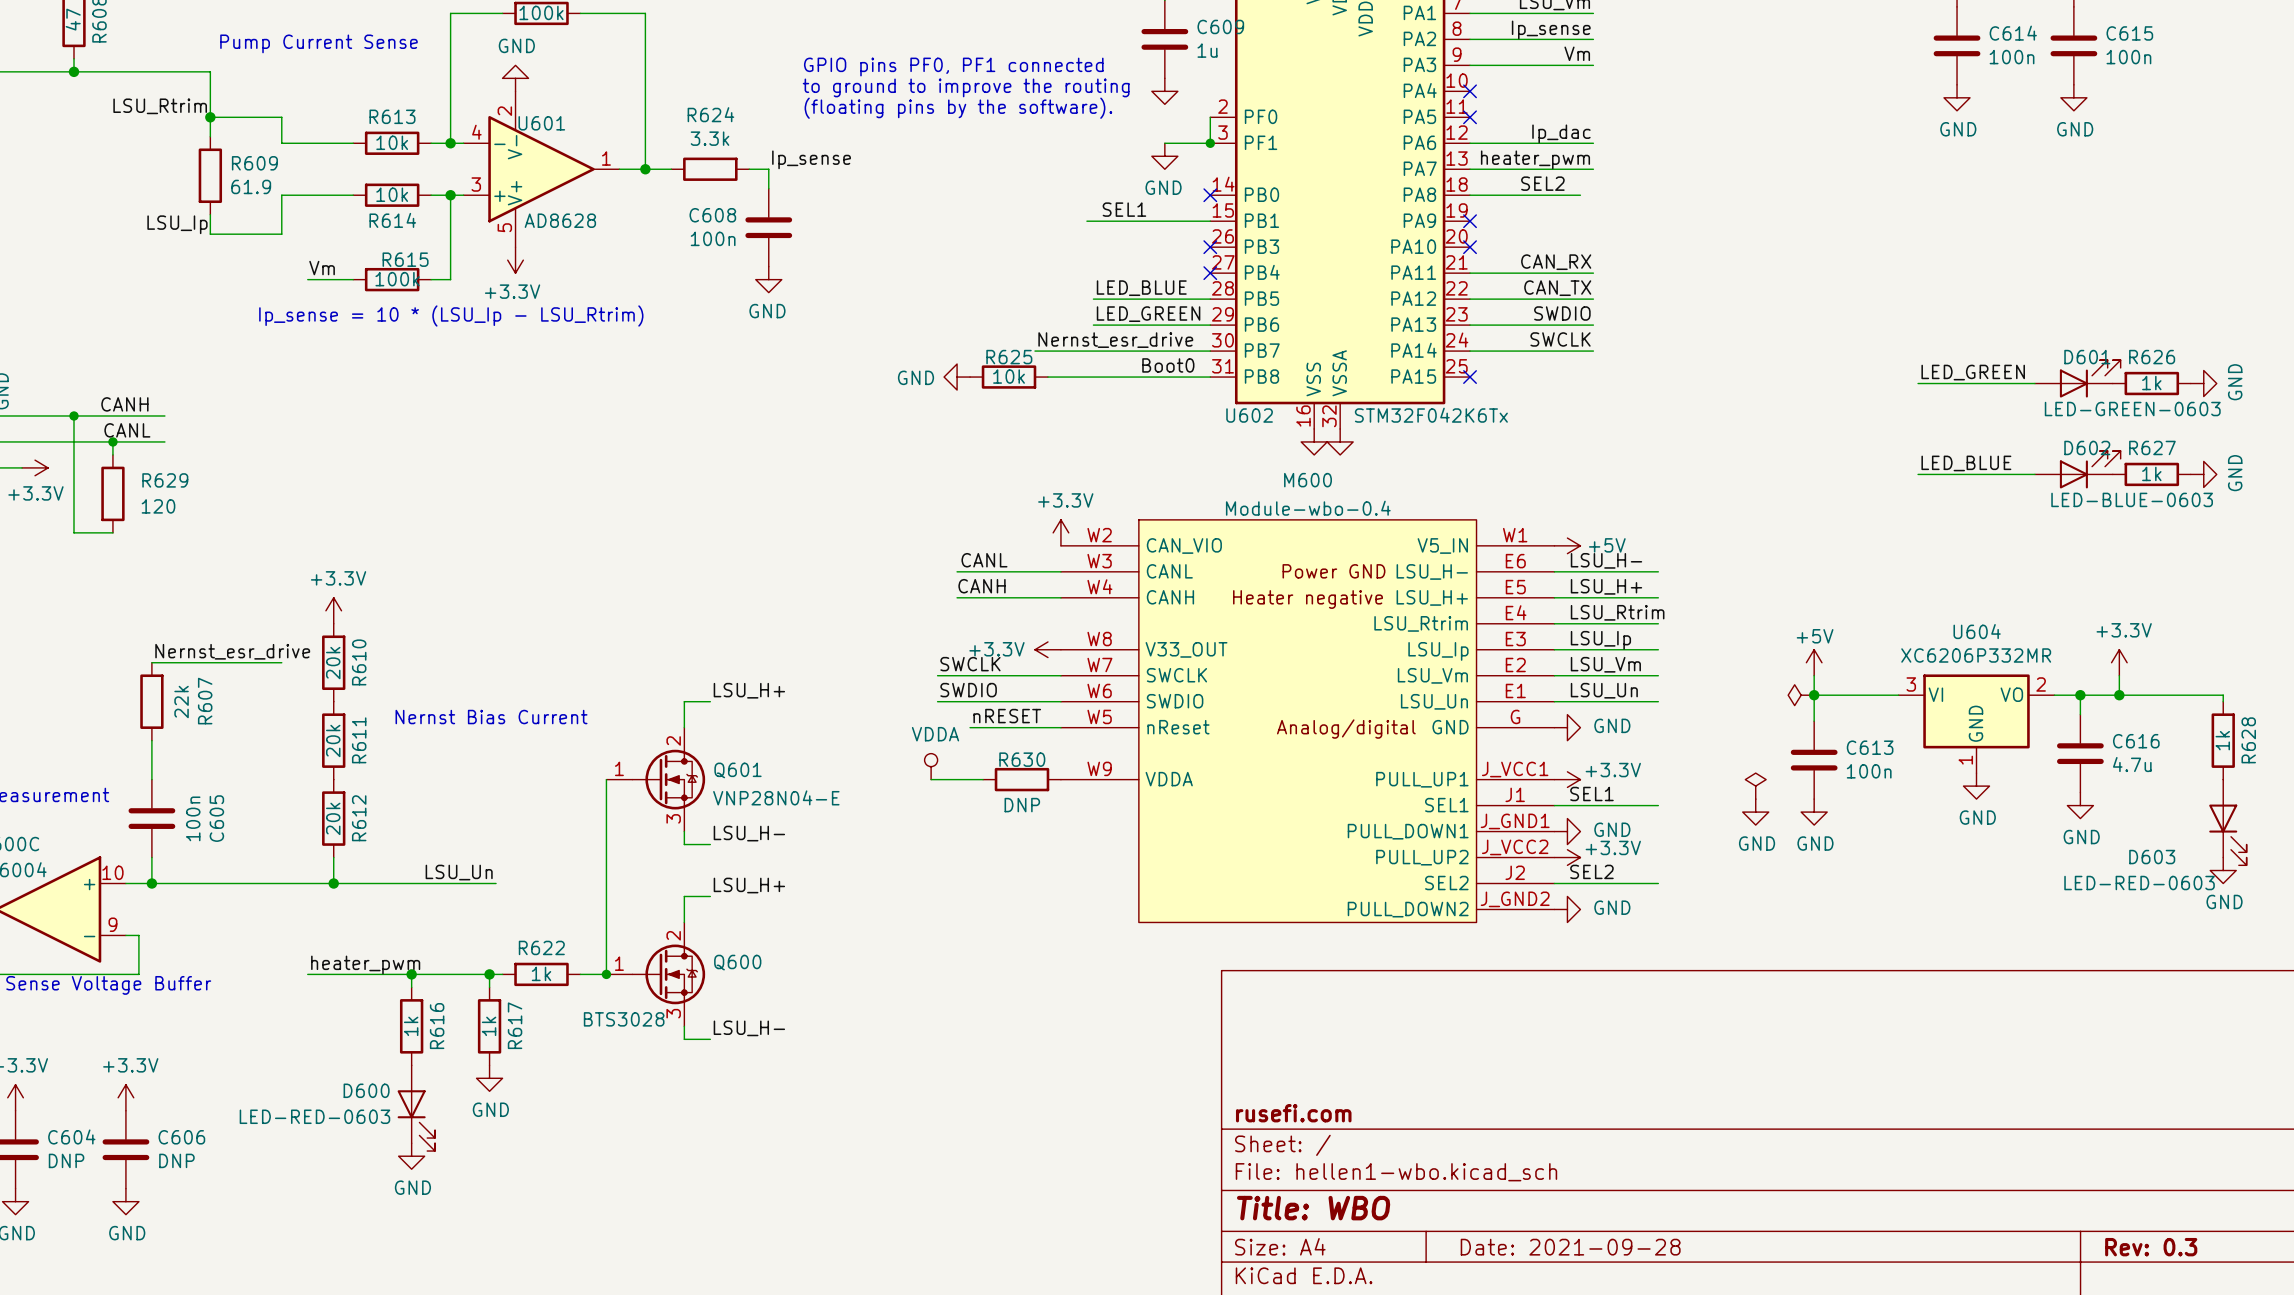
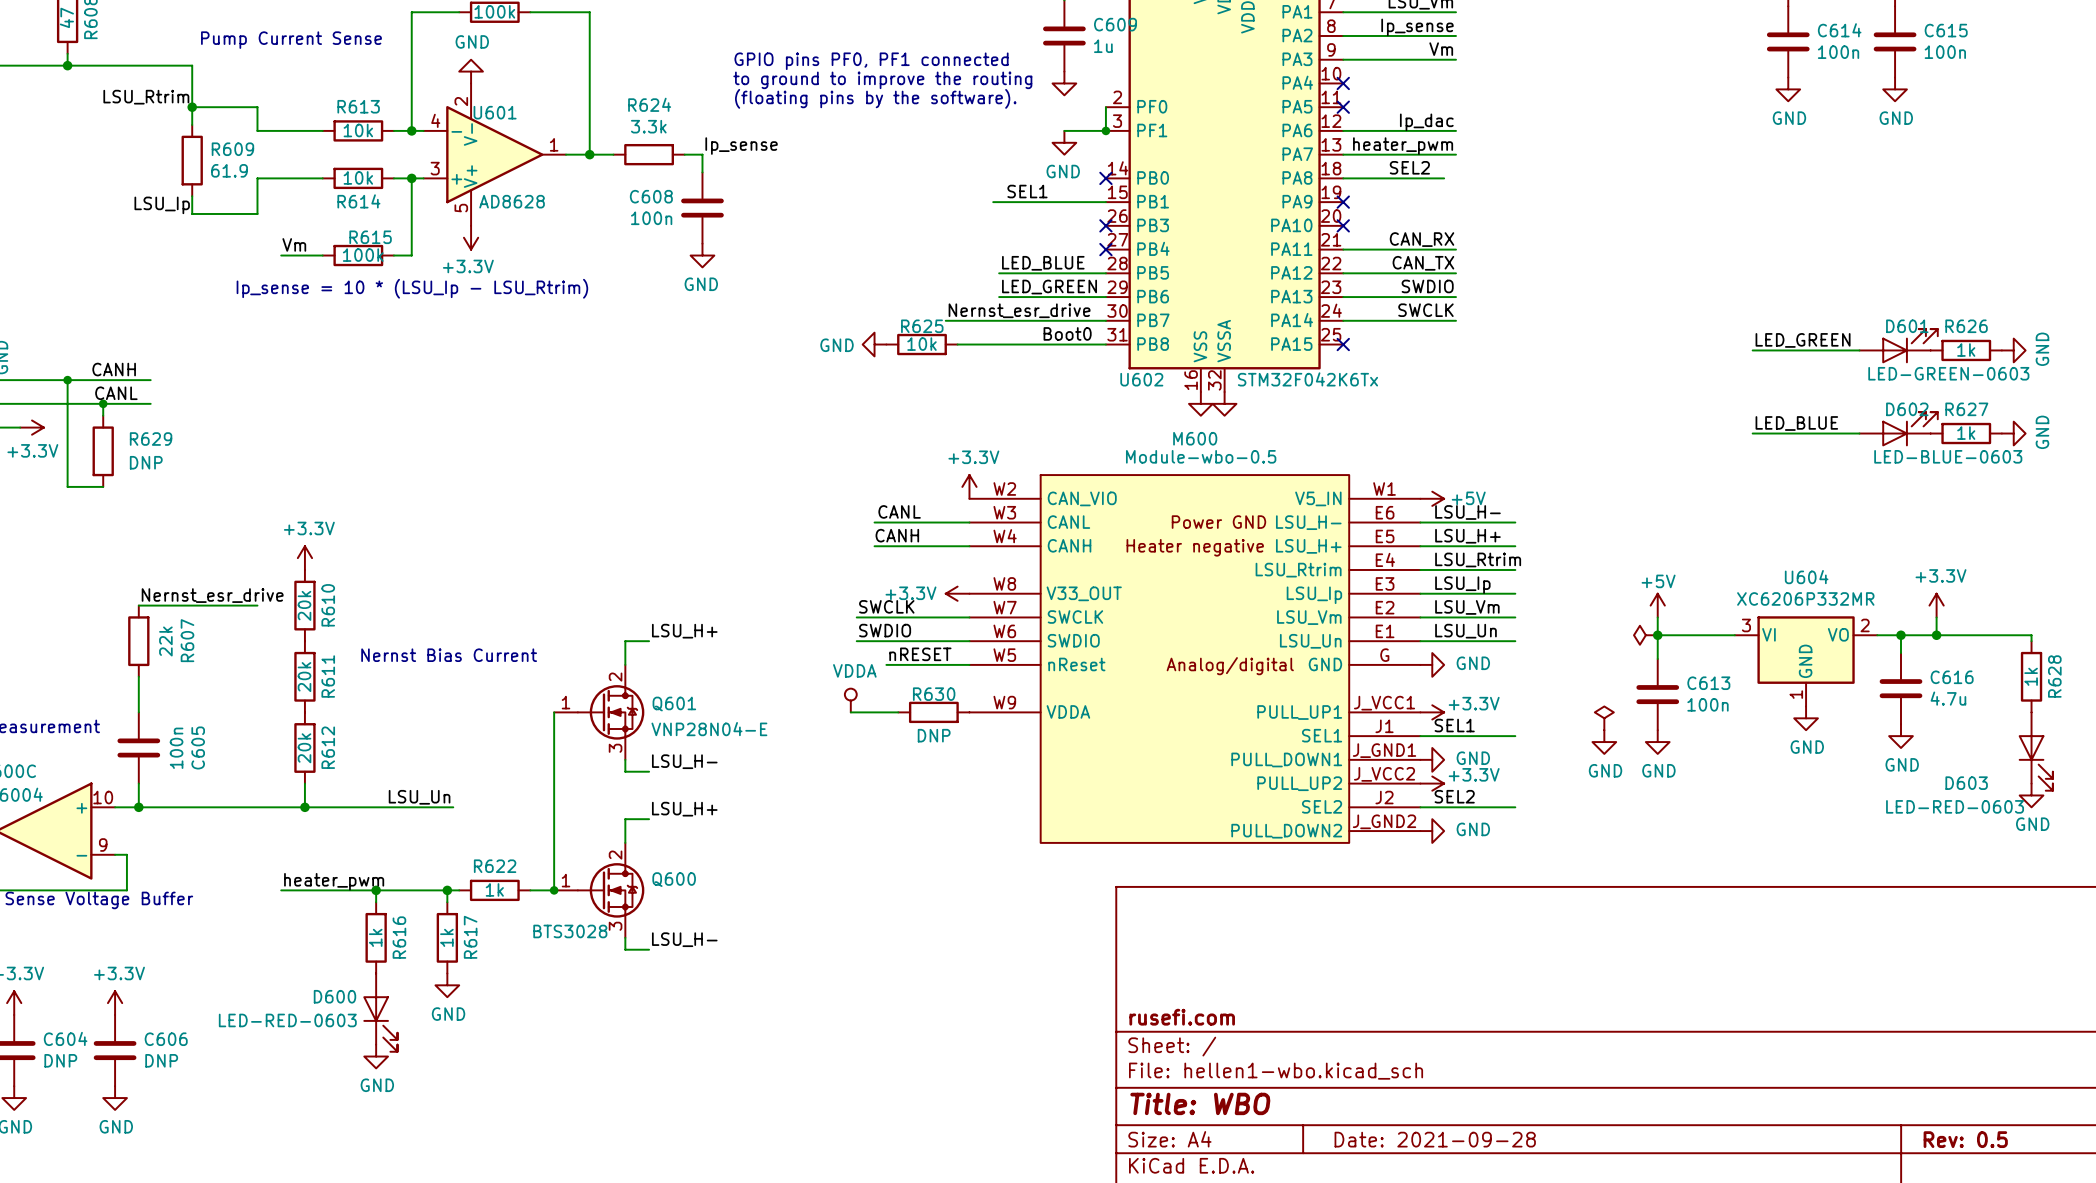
R629 value: 120 (158, 506) -> DNP (146, 462)
M600 value: Module-wbo-0.4 (1308, 508) -> Module-wbo-0.5 (1201, 456)
title block: Rev: 0.3 (2151, 1247) -> Rev: 0.5 (1965, 1139)

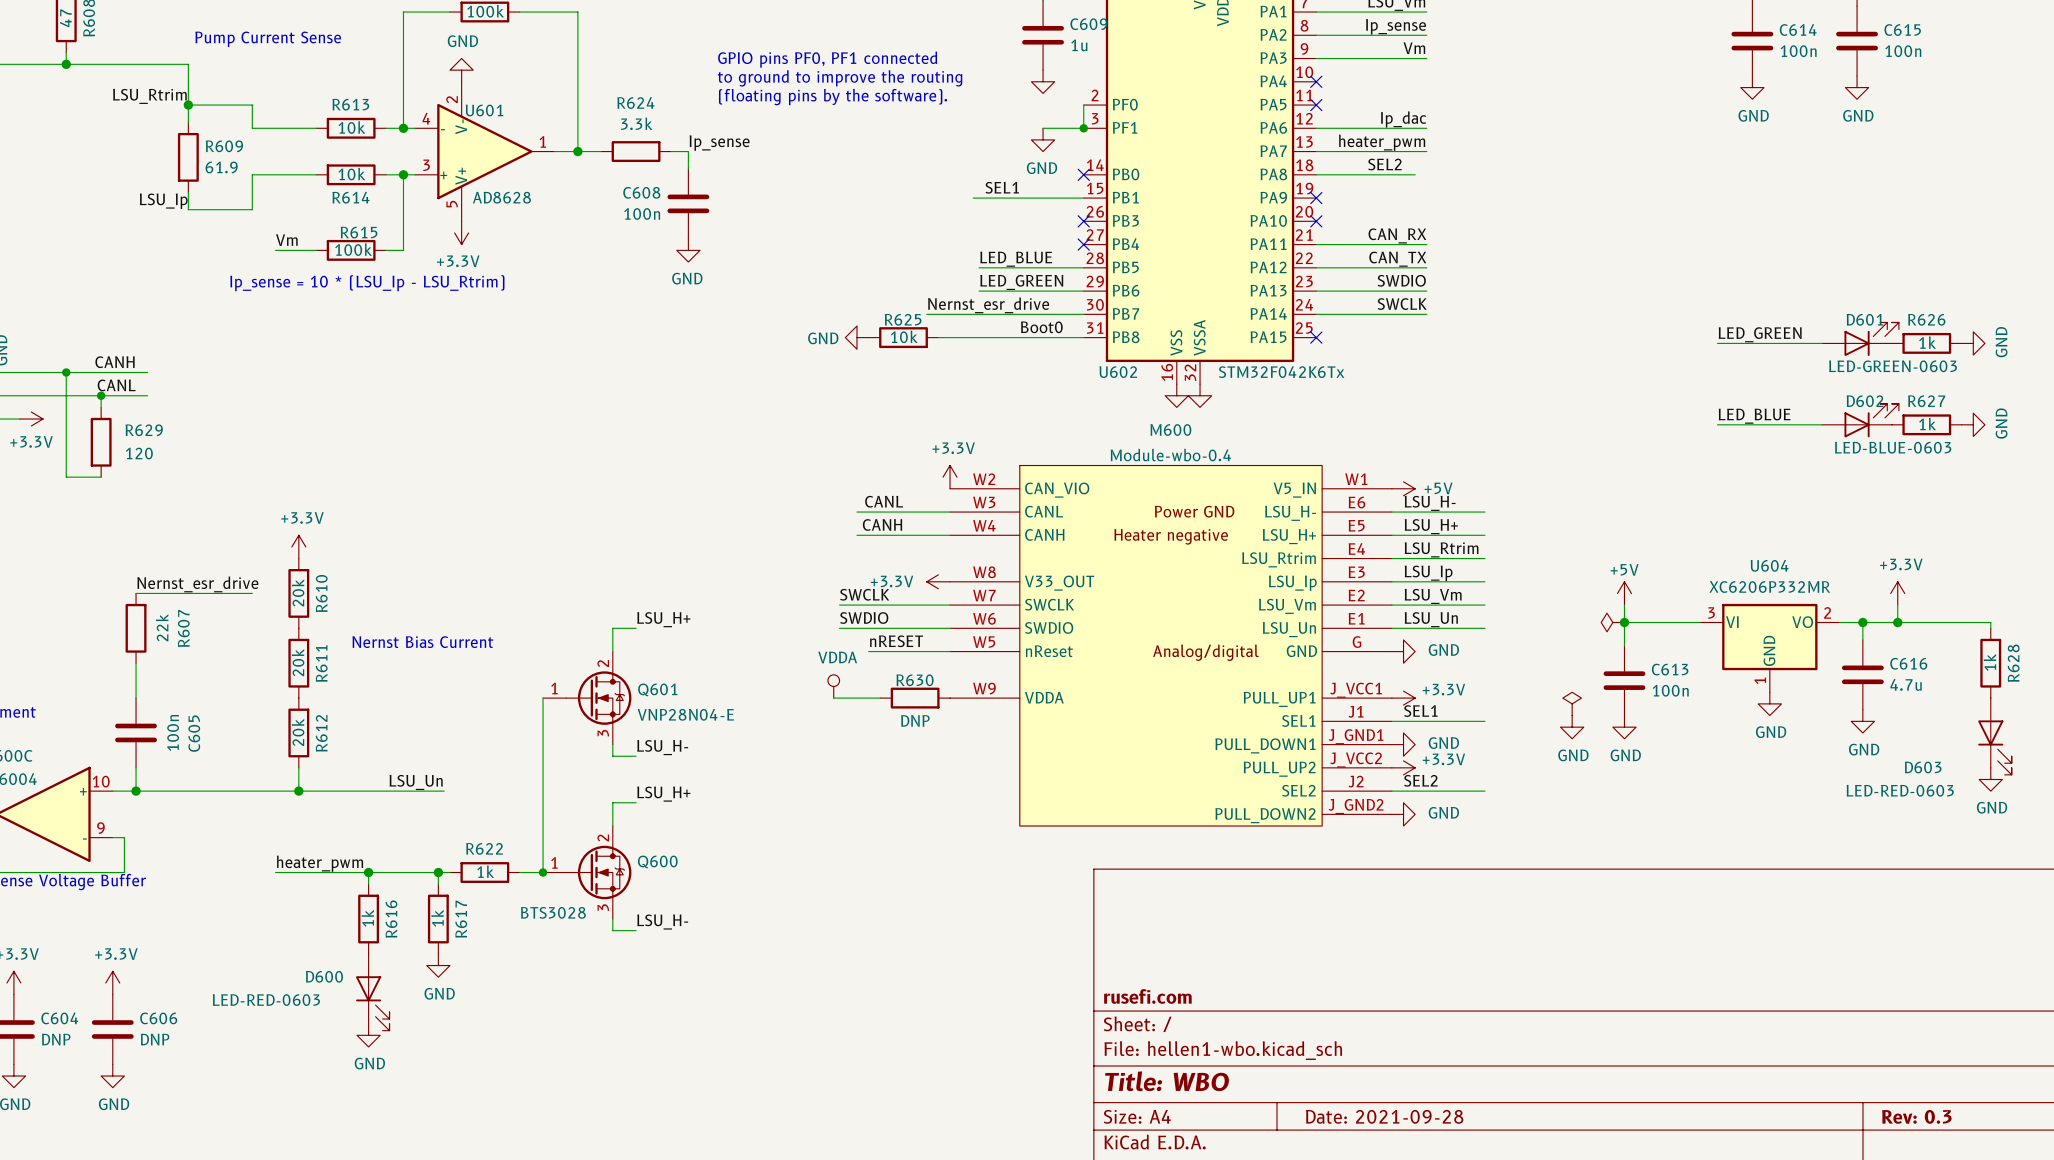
M600 value: Module-wbo-0.5 (1201, 456) -> Module-wbo-0.4 (1170, 455)
R629 value: DNP (146, 462) -> 120 (139, 453)
title block: Rev: 0.5 (1965, 1139) -> Rev: 0.3 (1916, 1116)

